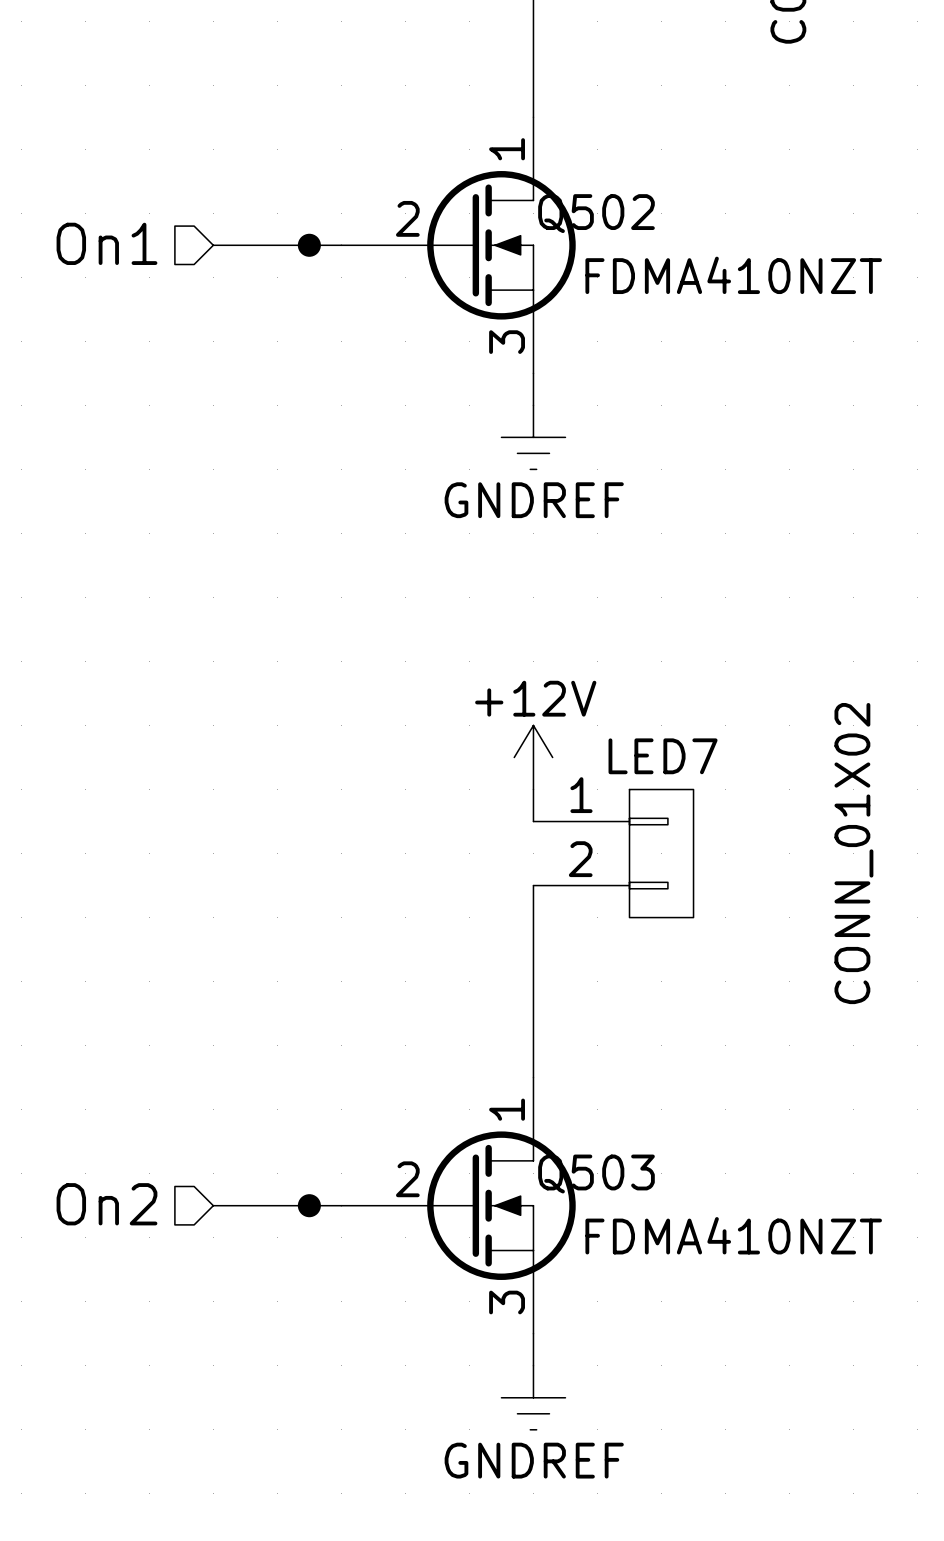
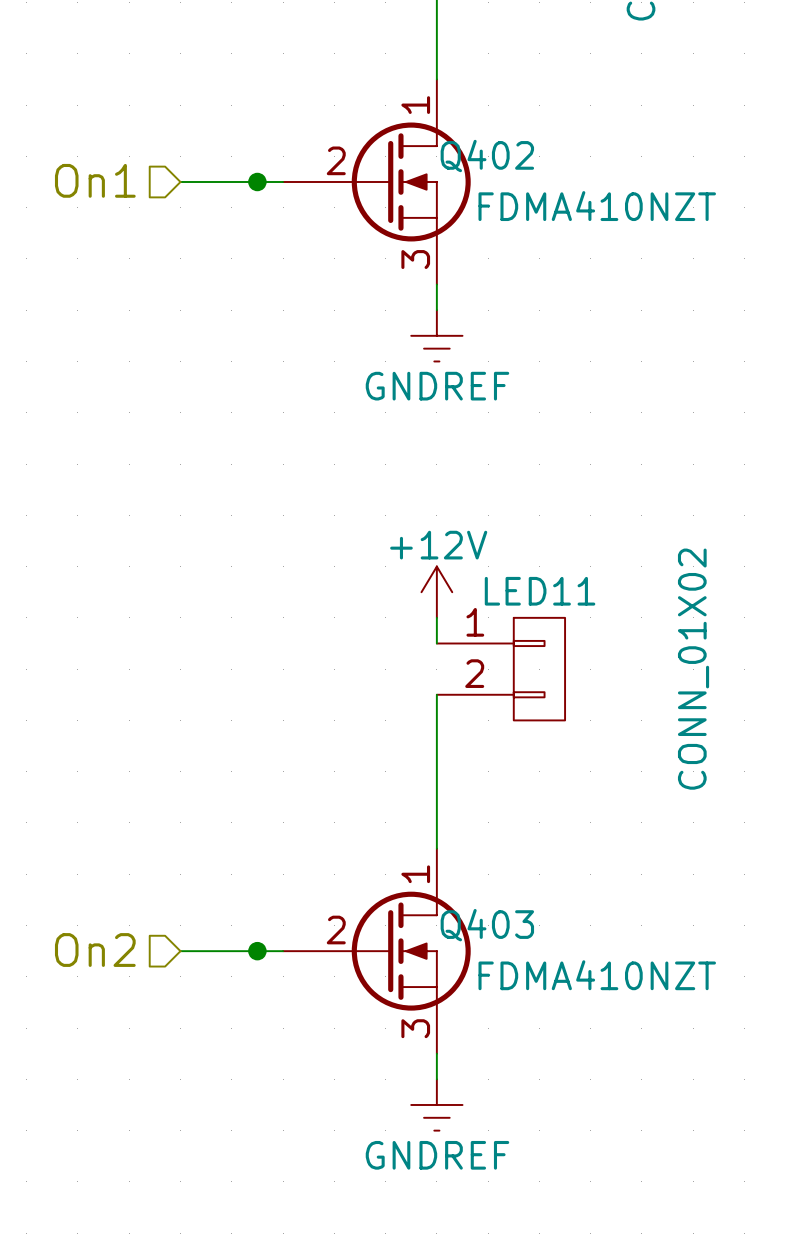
Q502 name: Q502 (596, 213) -> Q402 (487, 156)
LED7 name: LED7 (663, 756) -> LED11 (540, 591)
Q503 name: Q503 (596, 1174) -> Q403 (487, 925)

